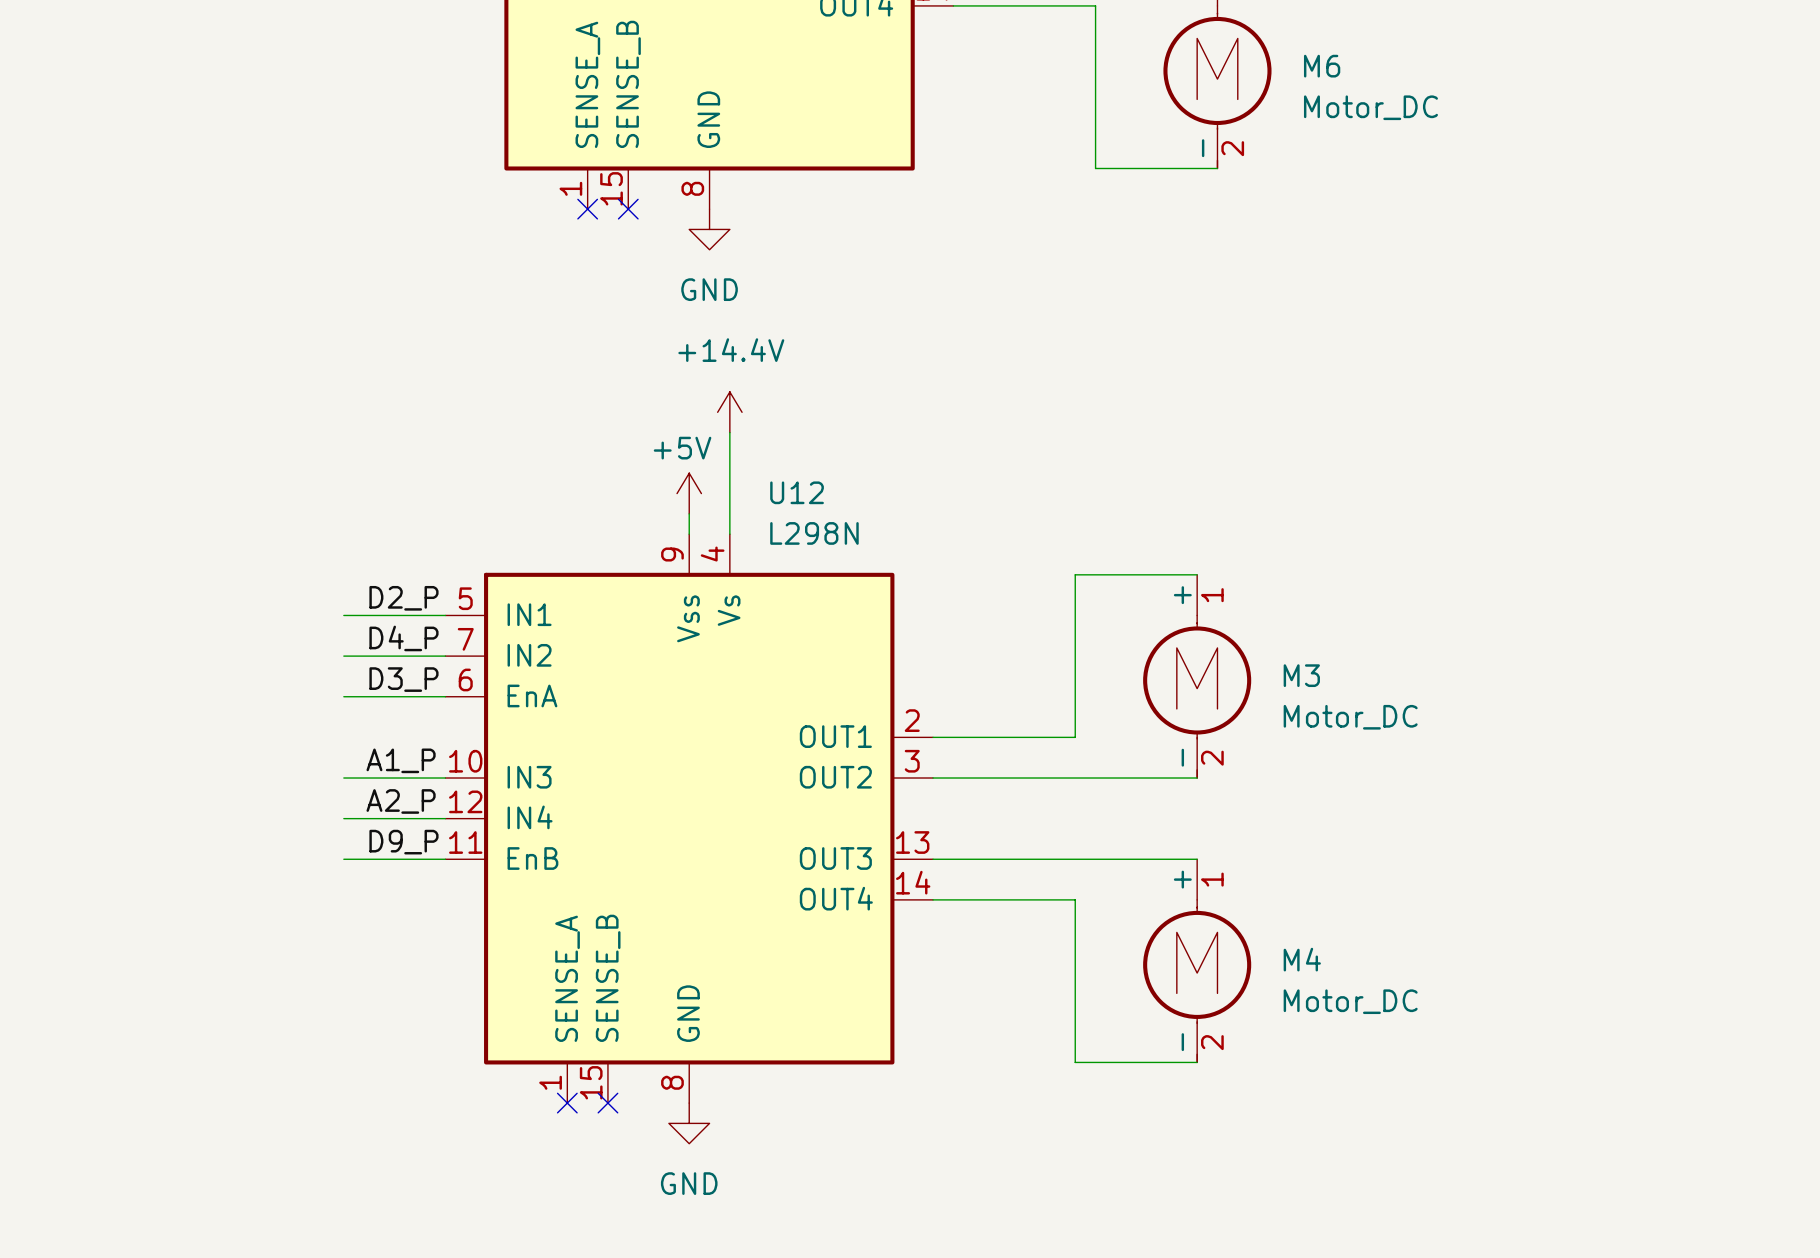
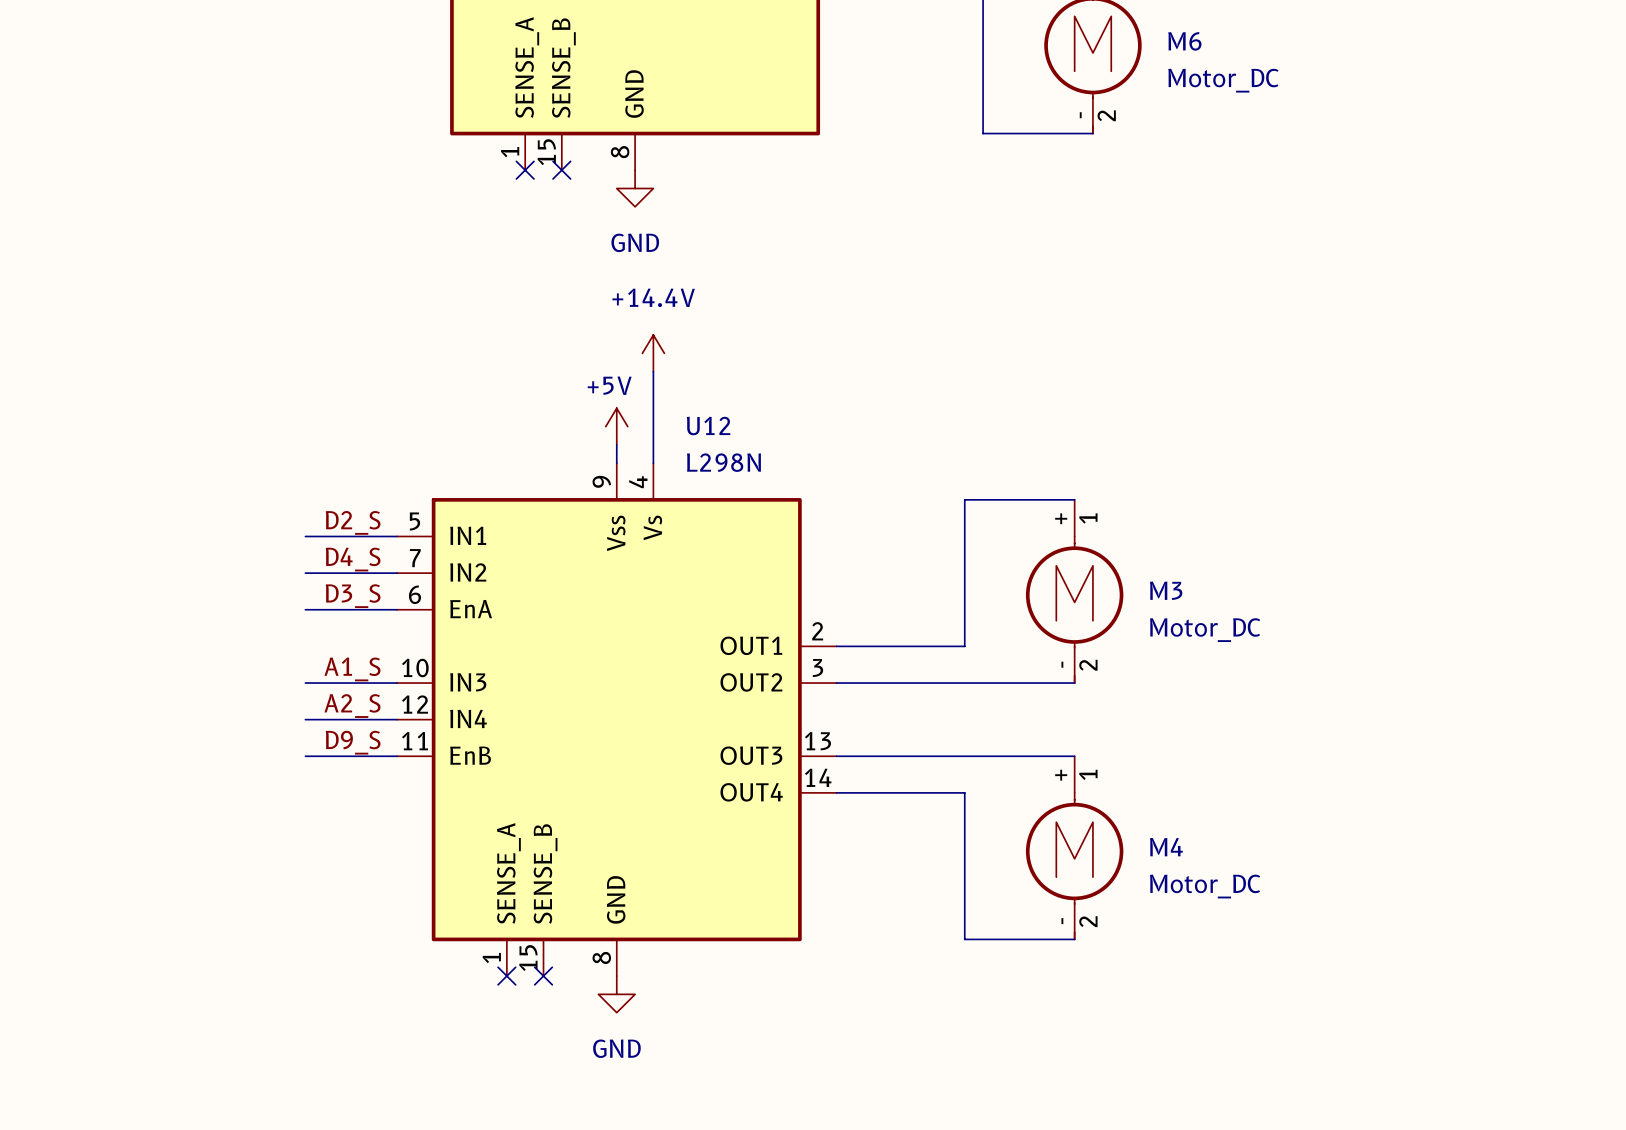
label: D2_P (403, 598) -> D2_S (353, 522)
label: D4_P (403, 638) -> D4_S (353, 559)
label: D3_P (403, 679) -> D3_S (353, 596)
label: A1_P (401, 760) -> A1_S (352, 669)
label: A2_P (401, 801) -> A2_S (352, 706)
label: D9_P (403, 842) -> D9_S (353, 742)

